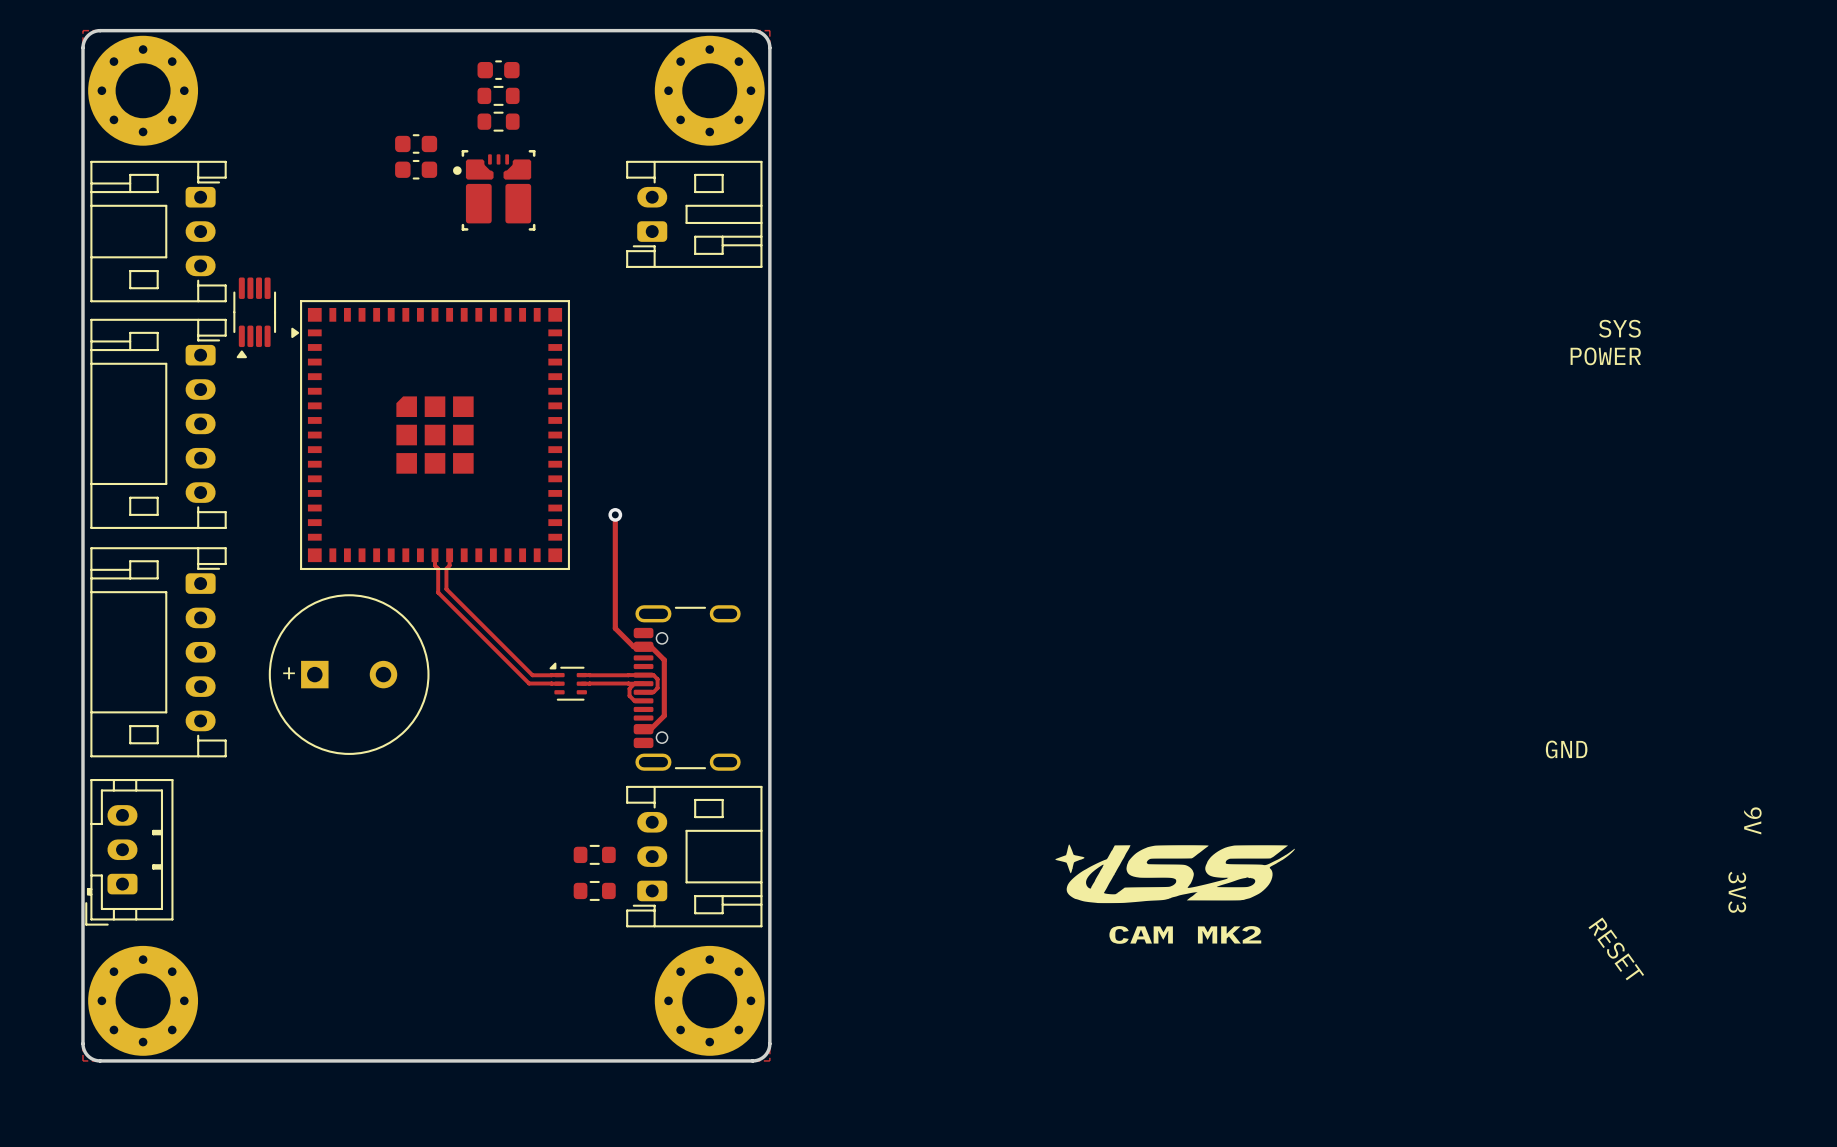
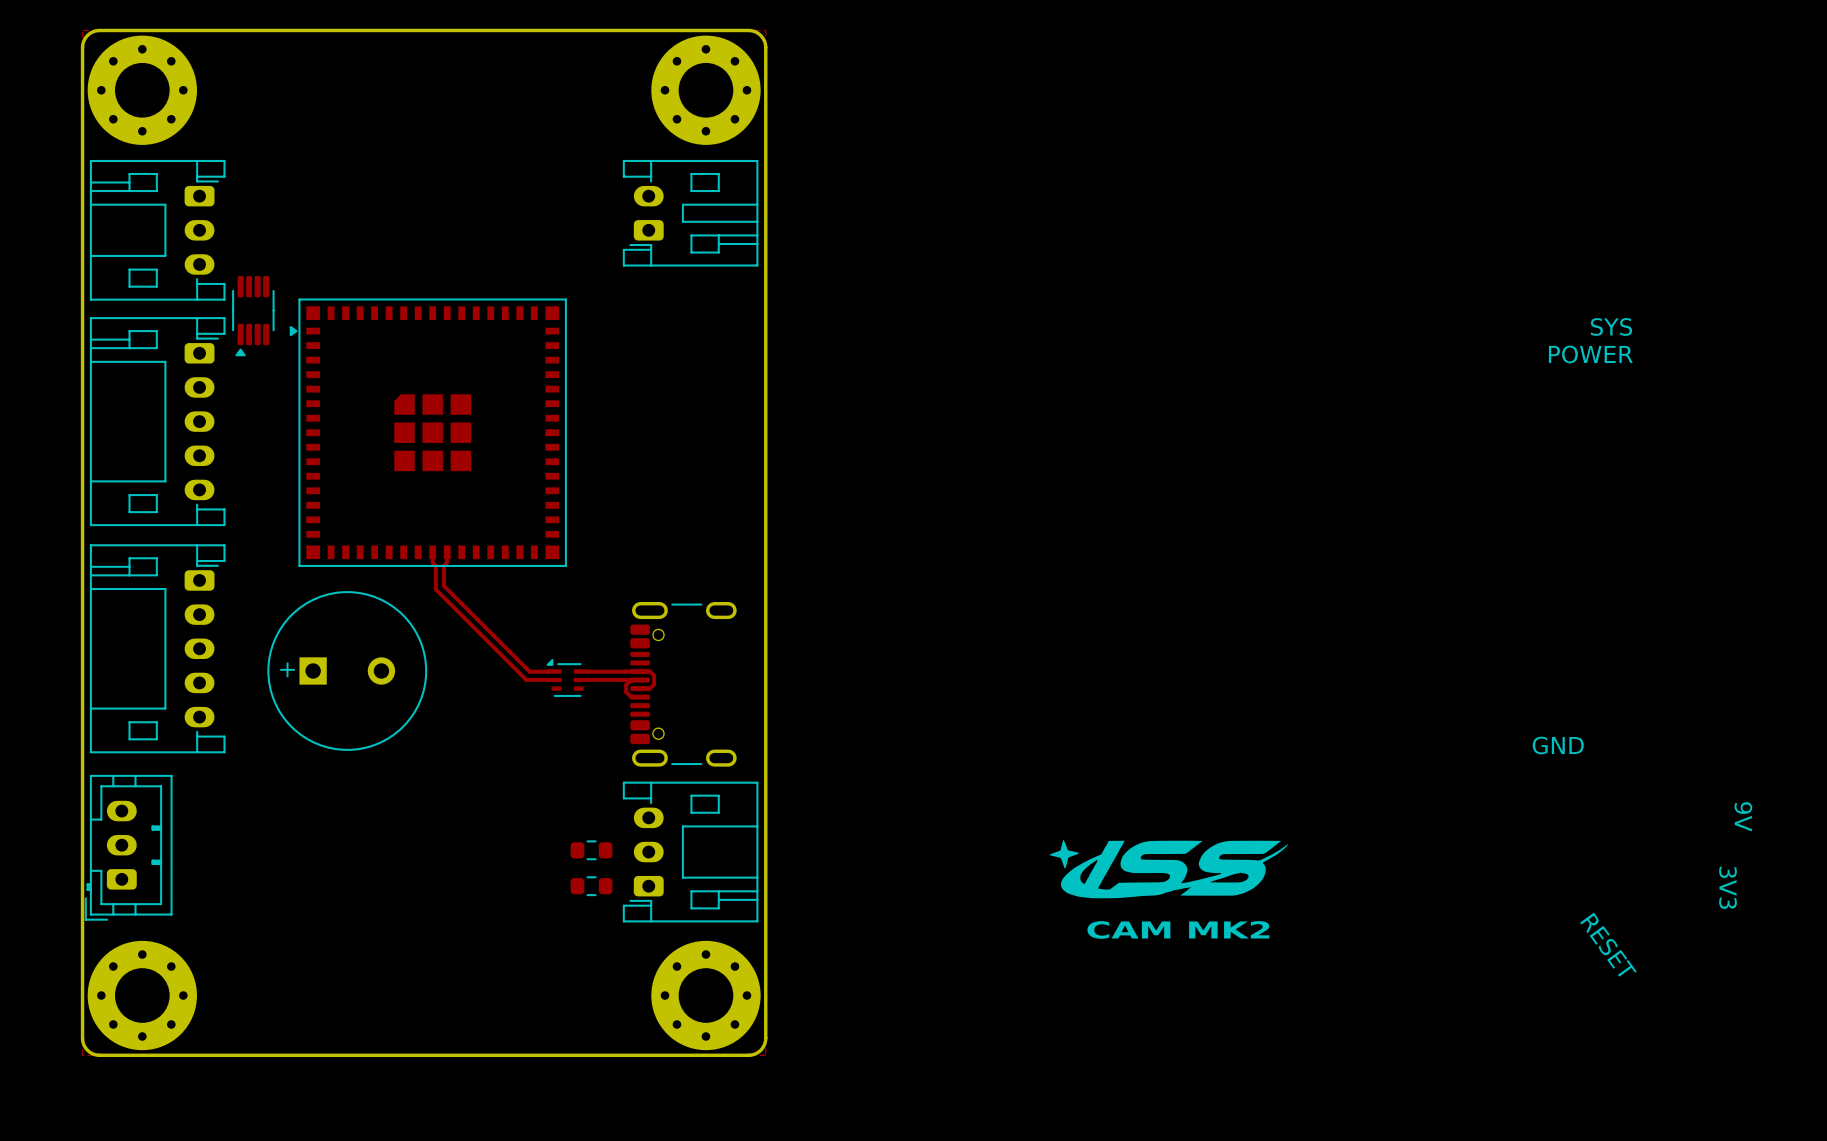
part: (498, 70) -> none
part: (498, 95) -> none
part: (498, 121) -> none
part: (416, 143) -> none
part: (416, 169) -> none
part: (494, 190) -> none
track: (615, 514) (615, 628) (633, 646) (651, 646) (664, 660) (664, 715) (650, 729) (643, 729) -> none
via: (615, 514) -> none

